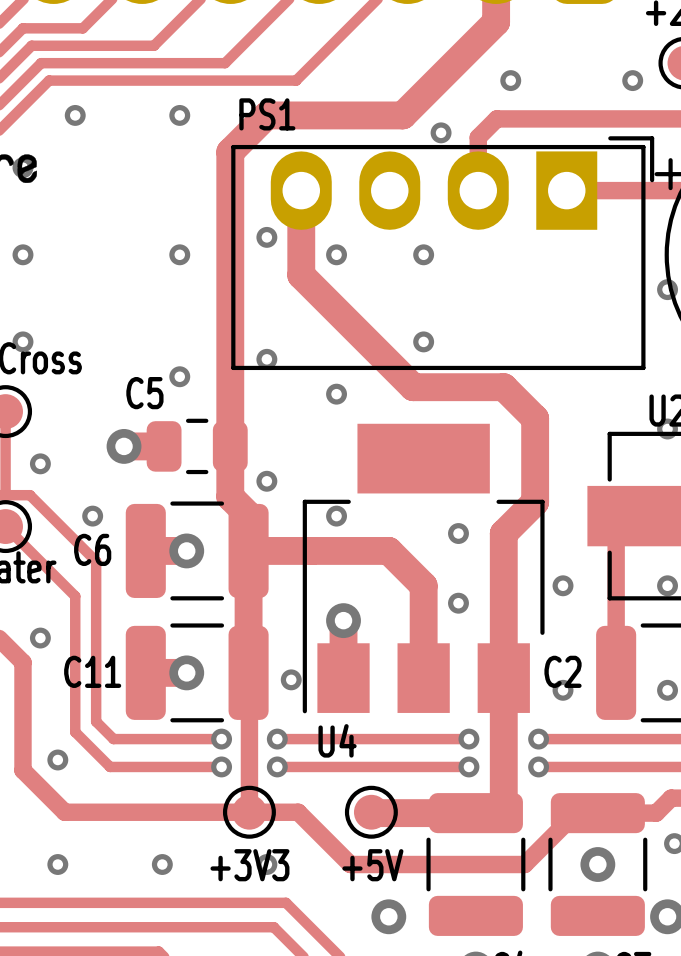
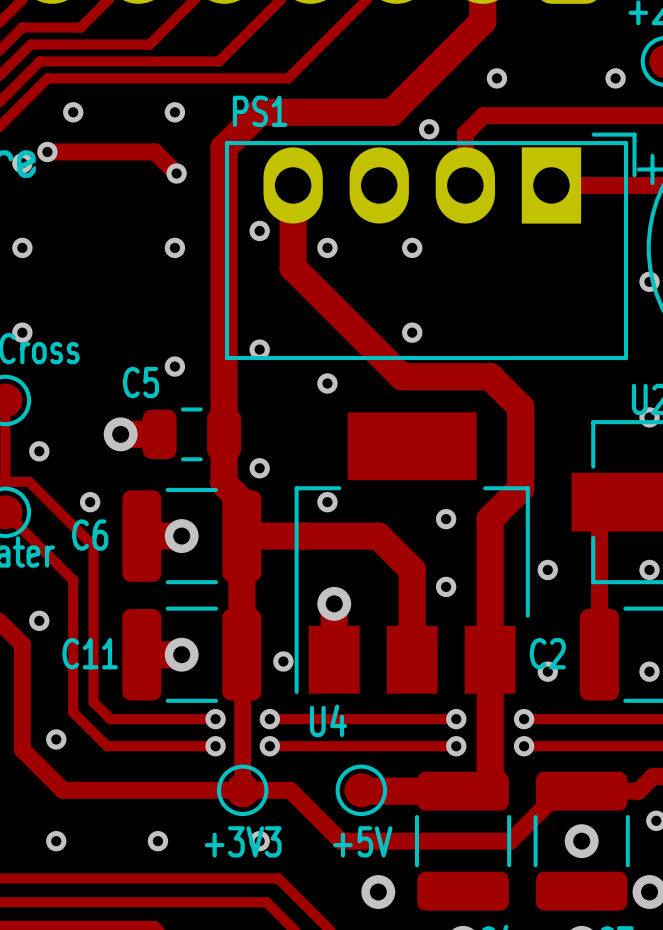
track: none -> (47, 151) (155, 151) (176, 173)
via: none -> (47, 151)
via: none -> (176, 173)

